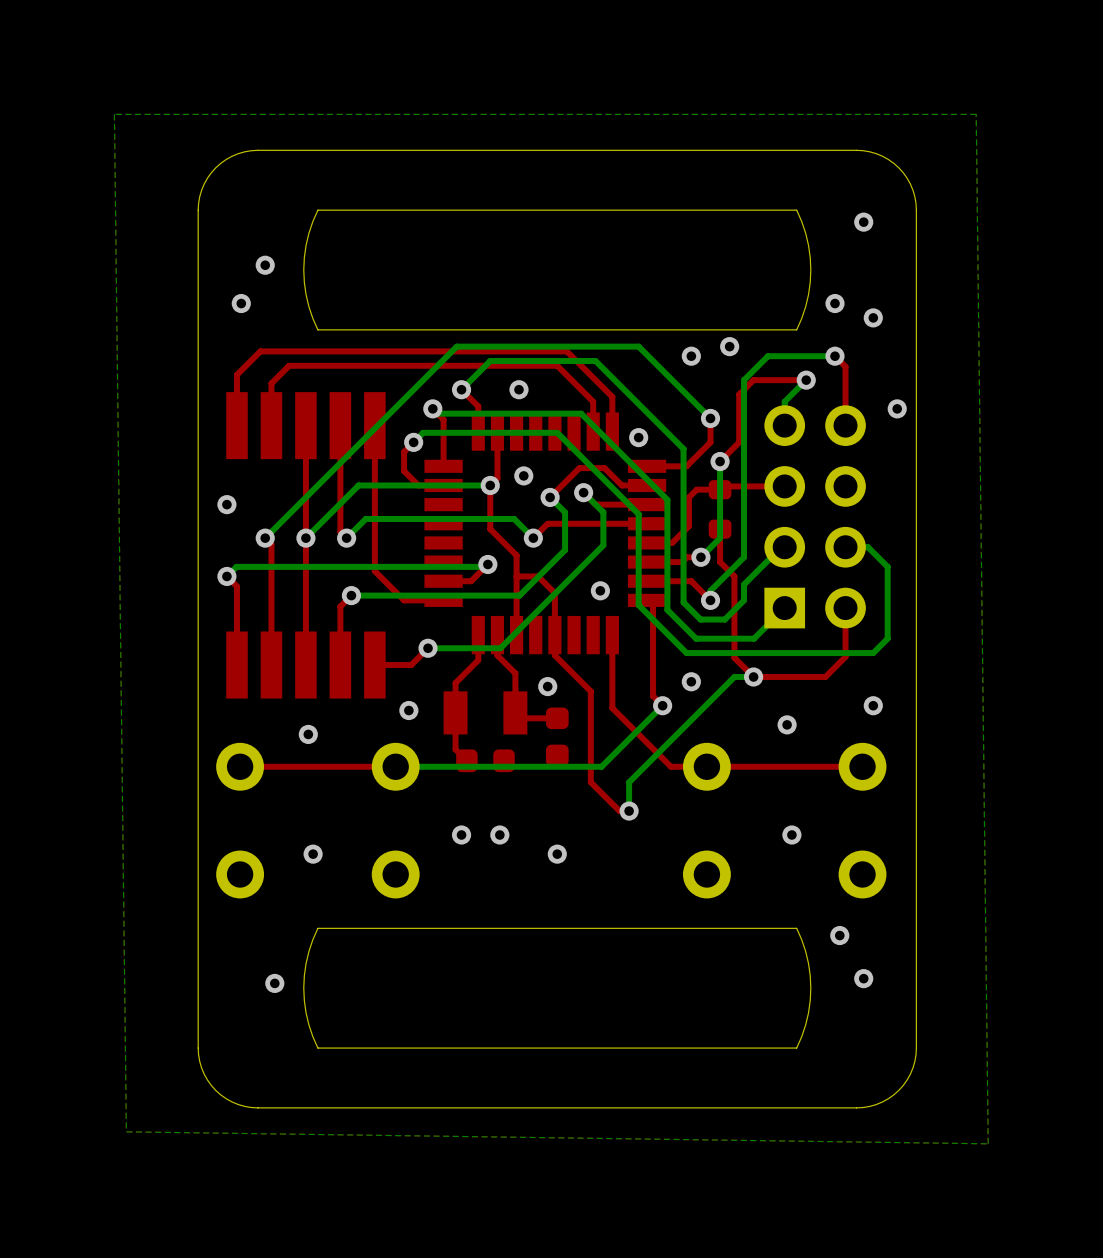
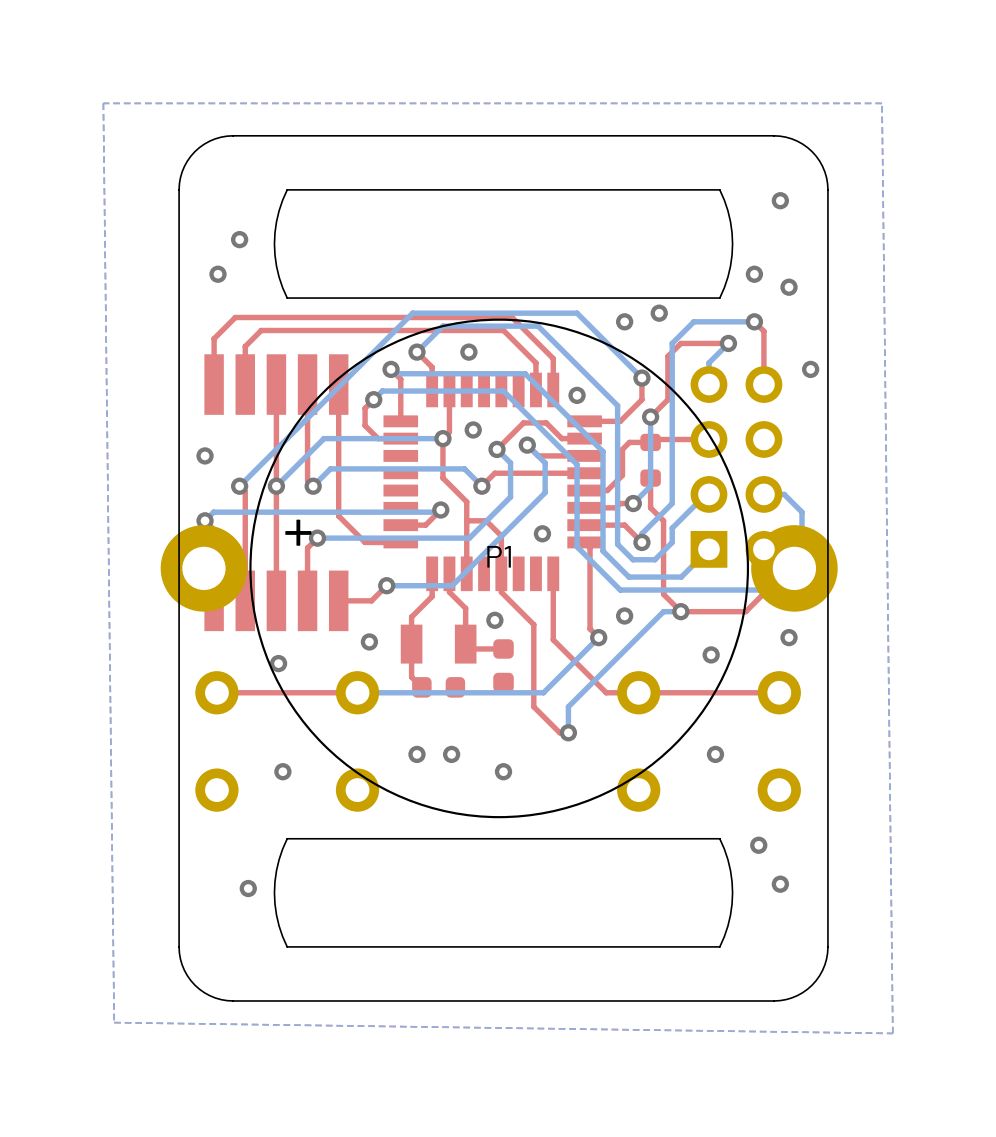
P1: none -> (499, 568)

